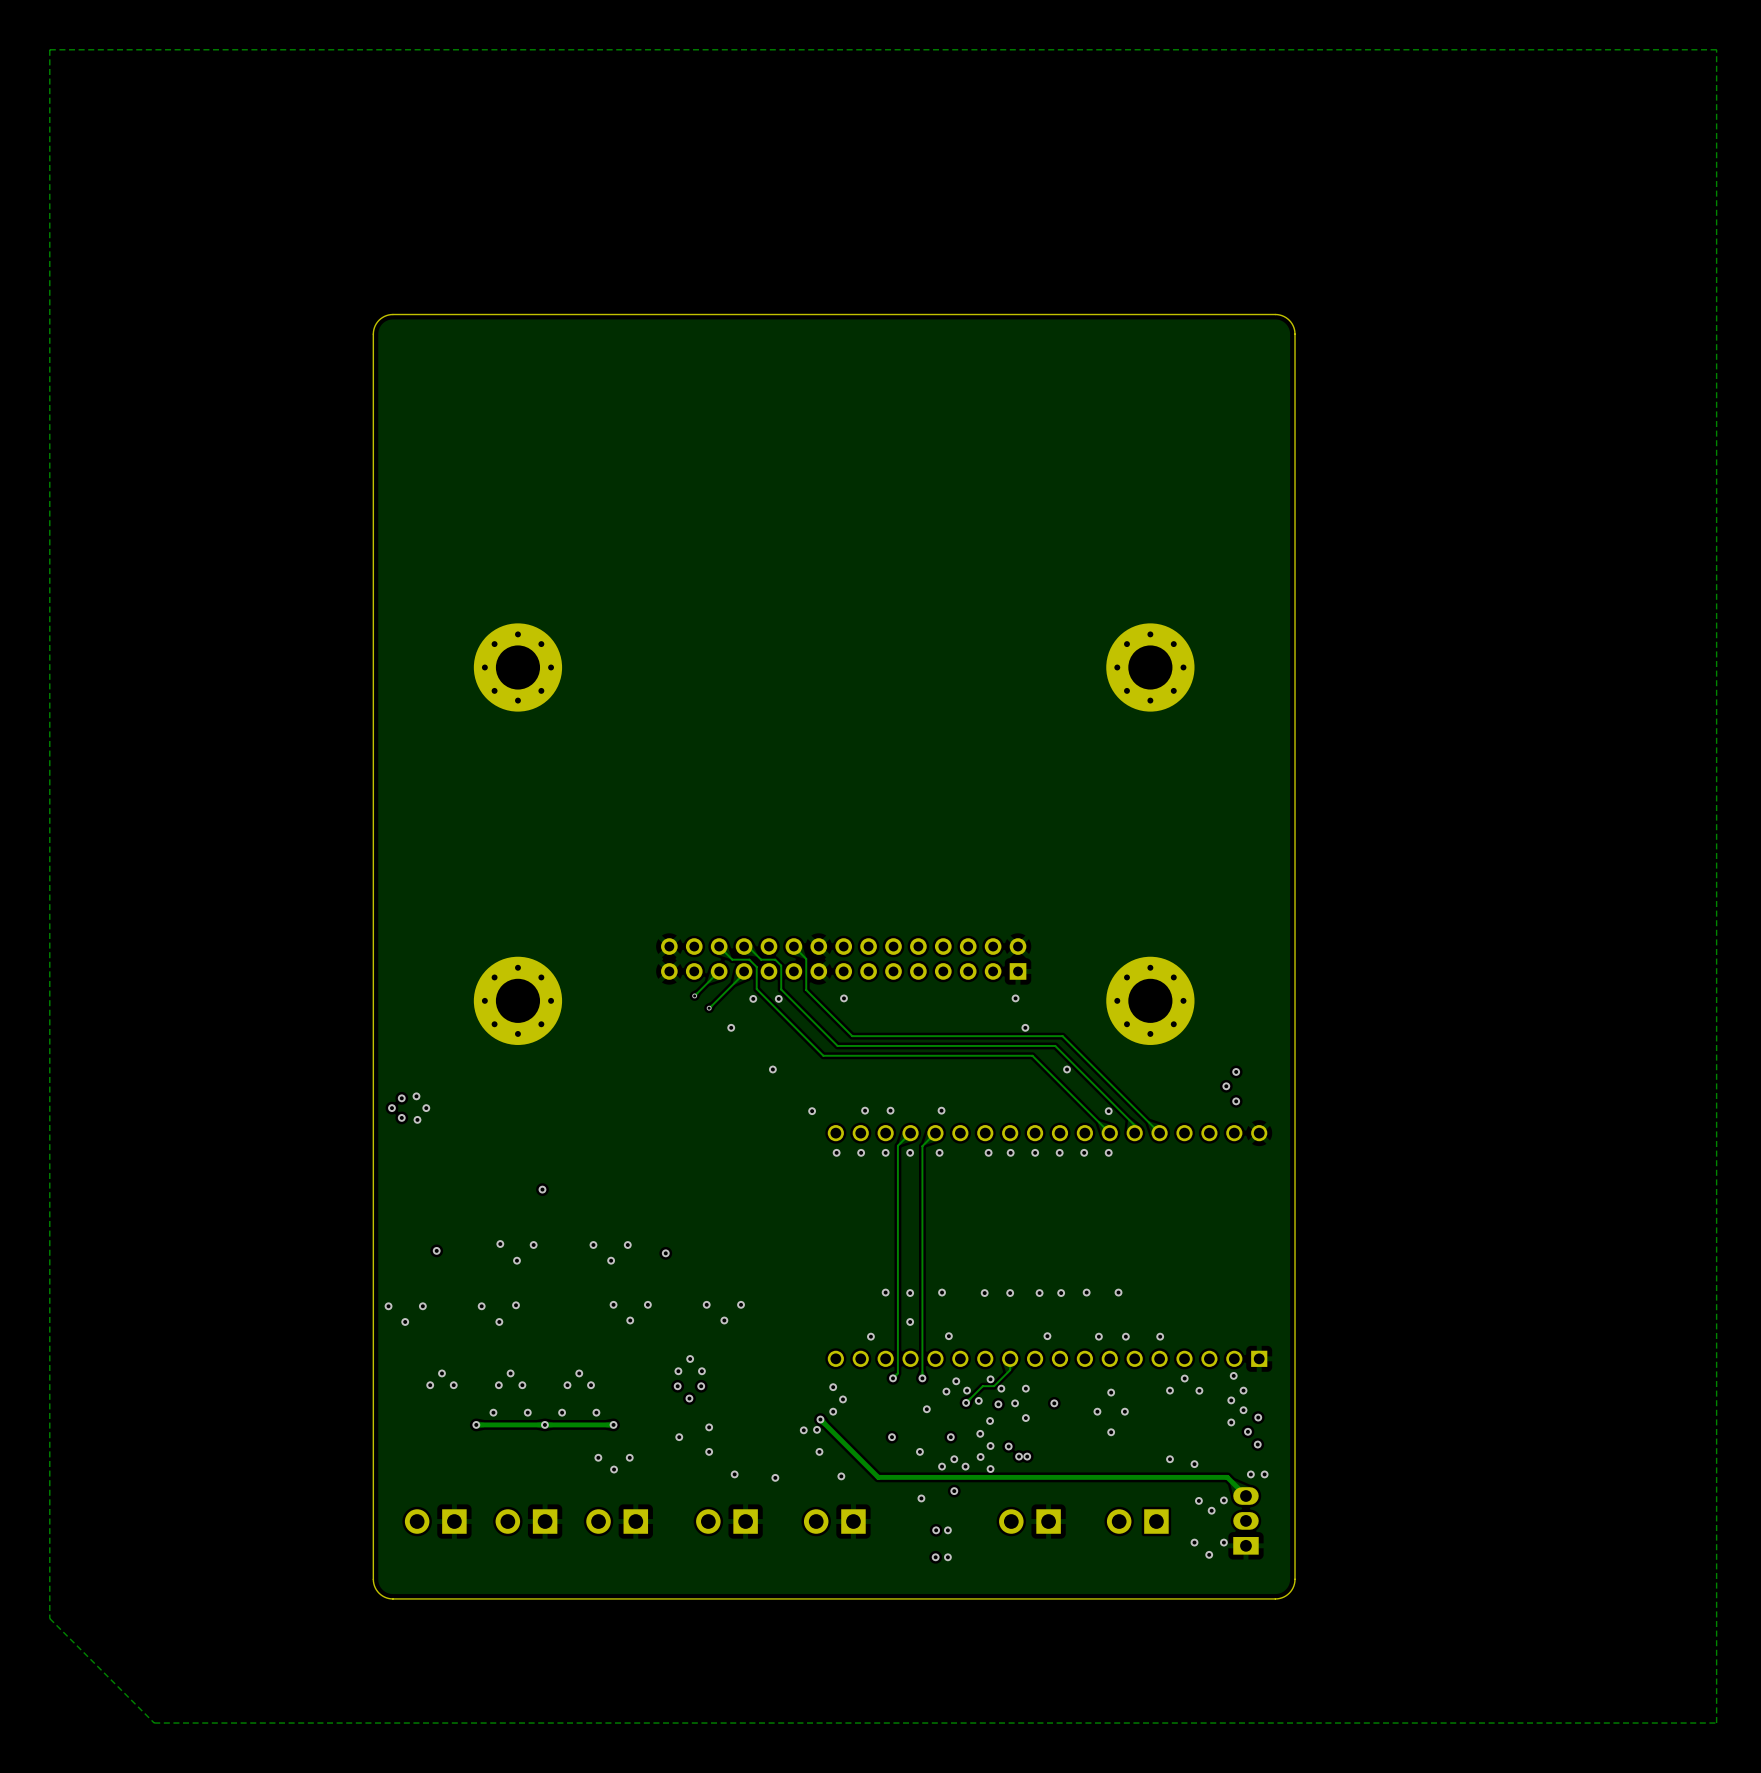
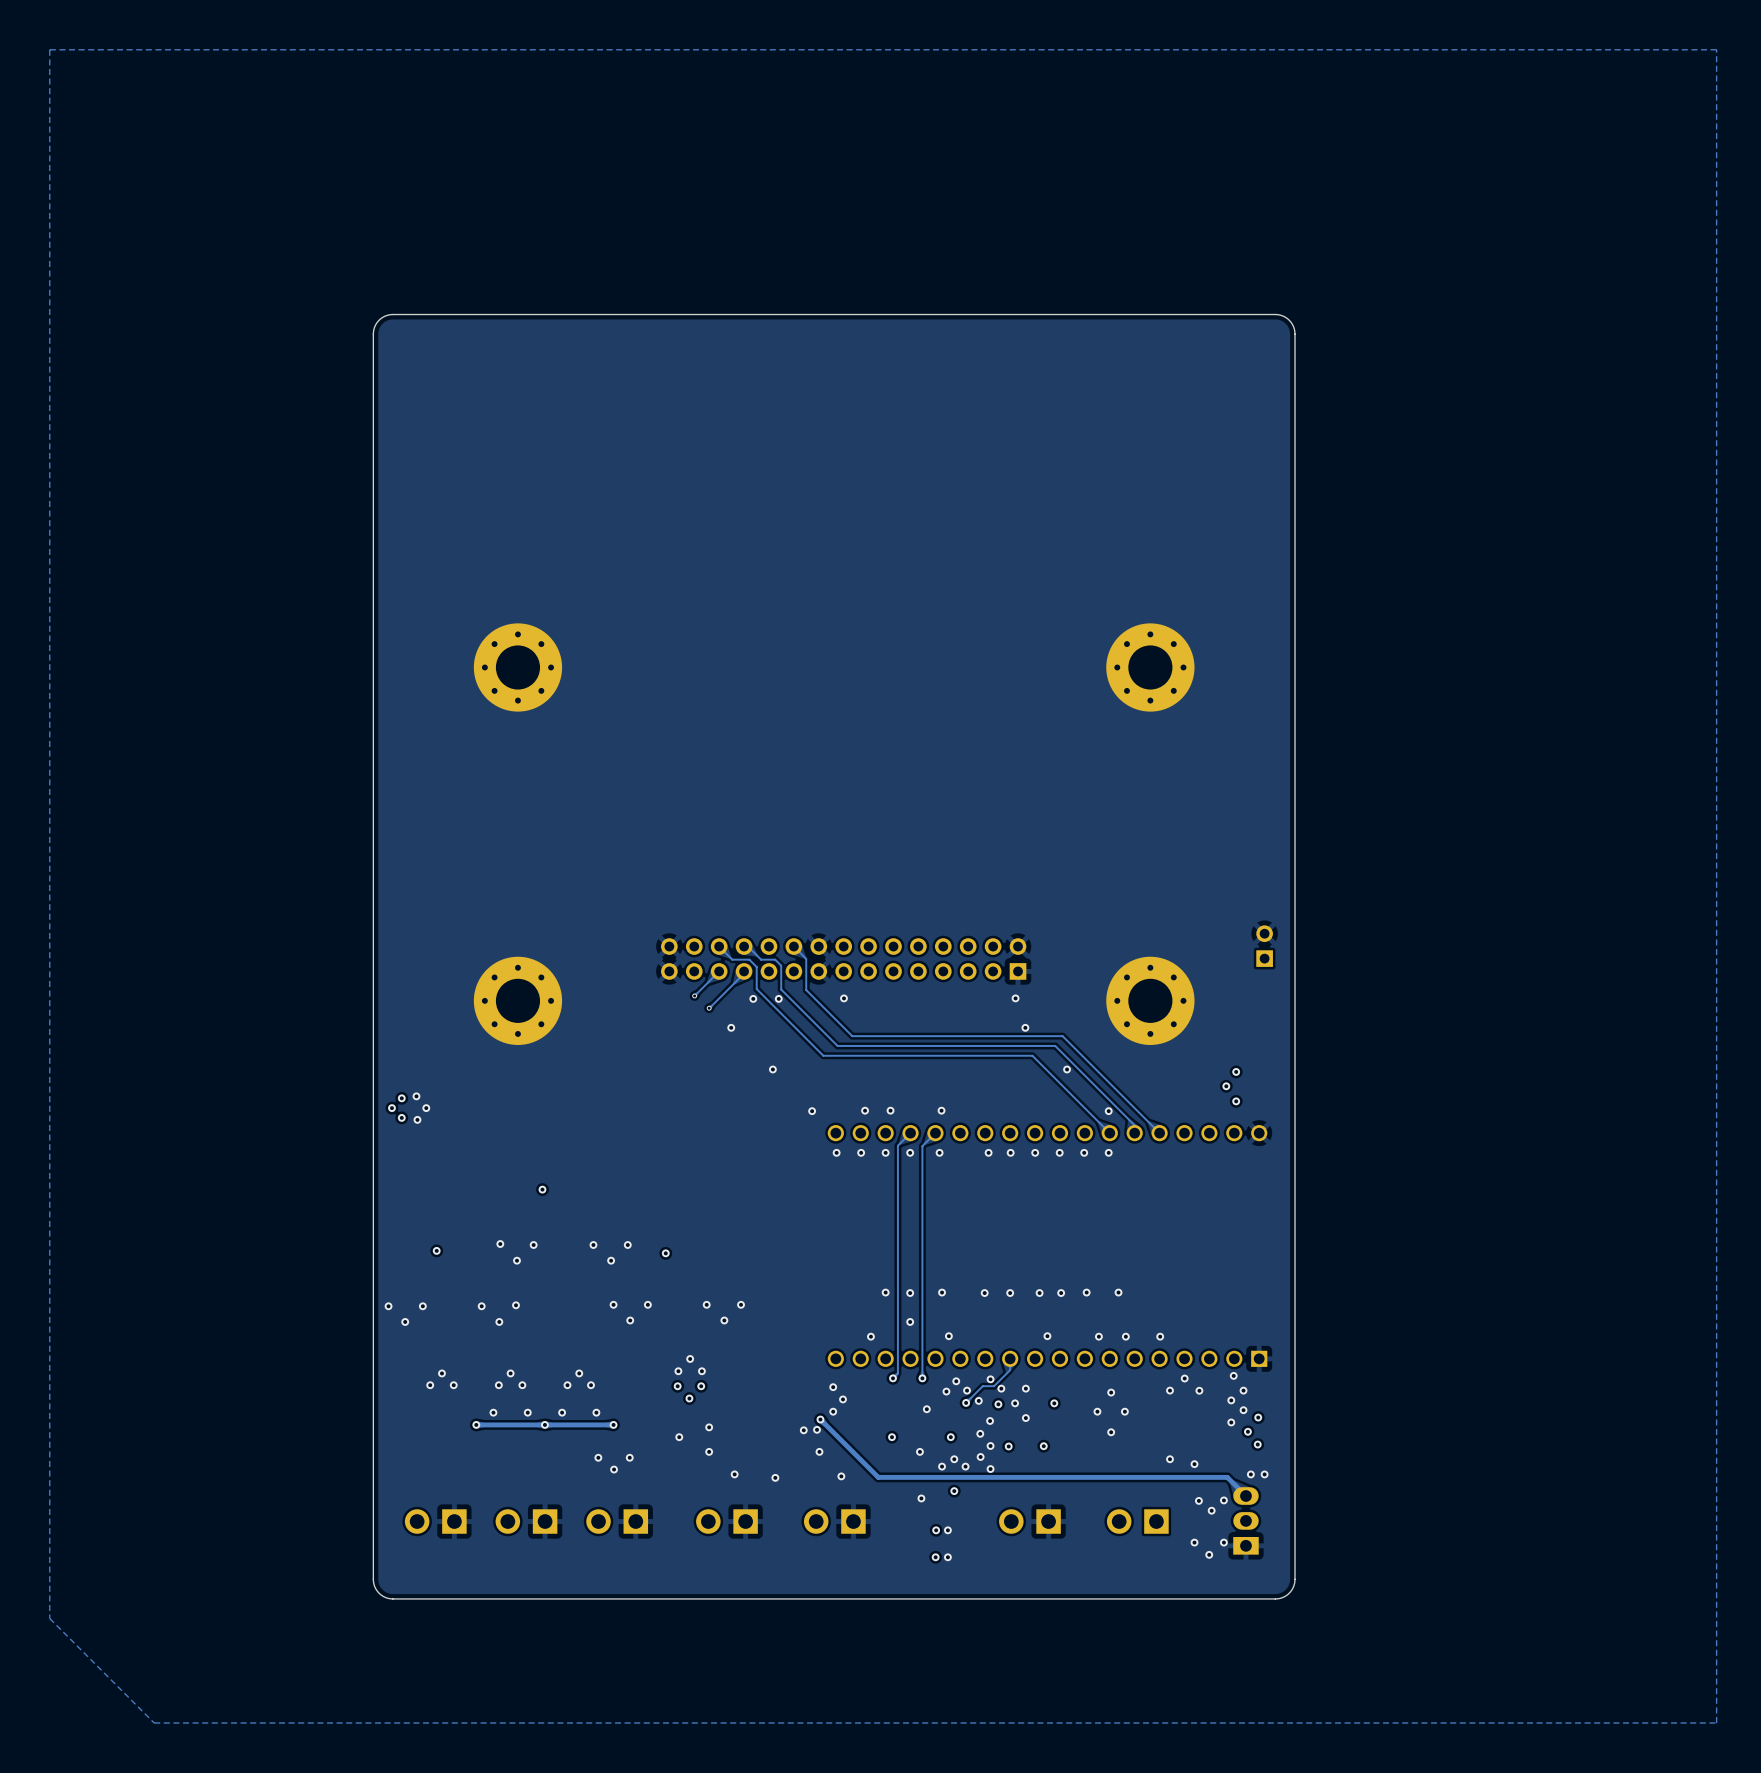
part: none -> (1264, 946)
via: none -> (1043, 1446)
via: (1019, 1456) -> none
via: (1027, 1456) -> none

